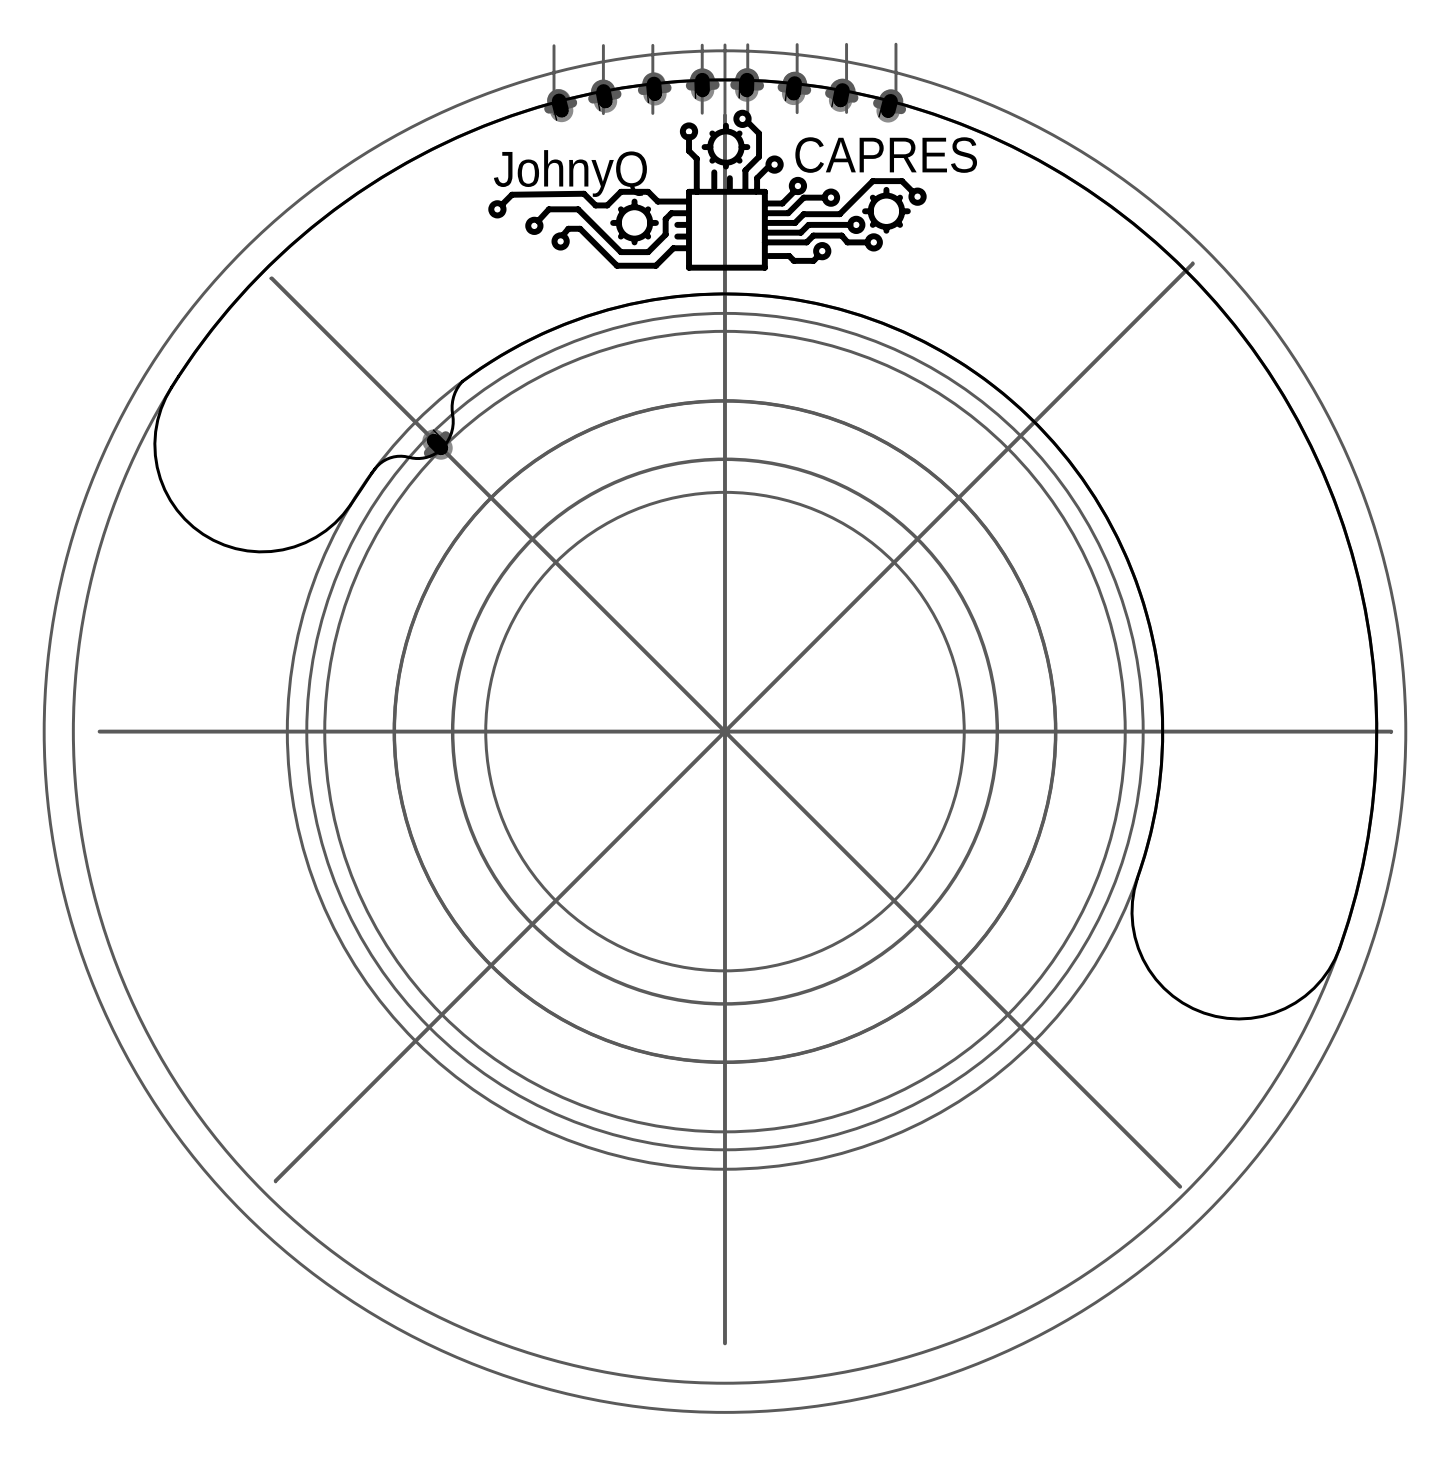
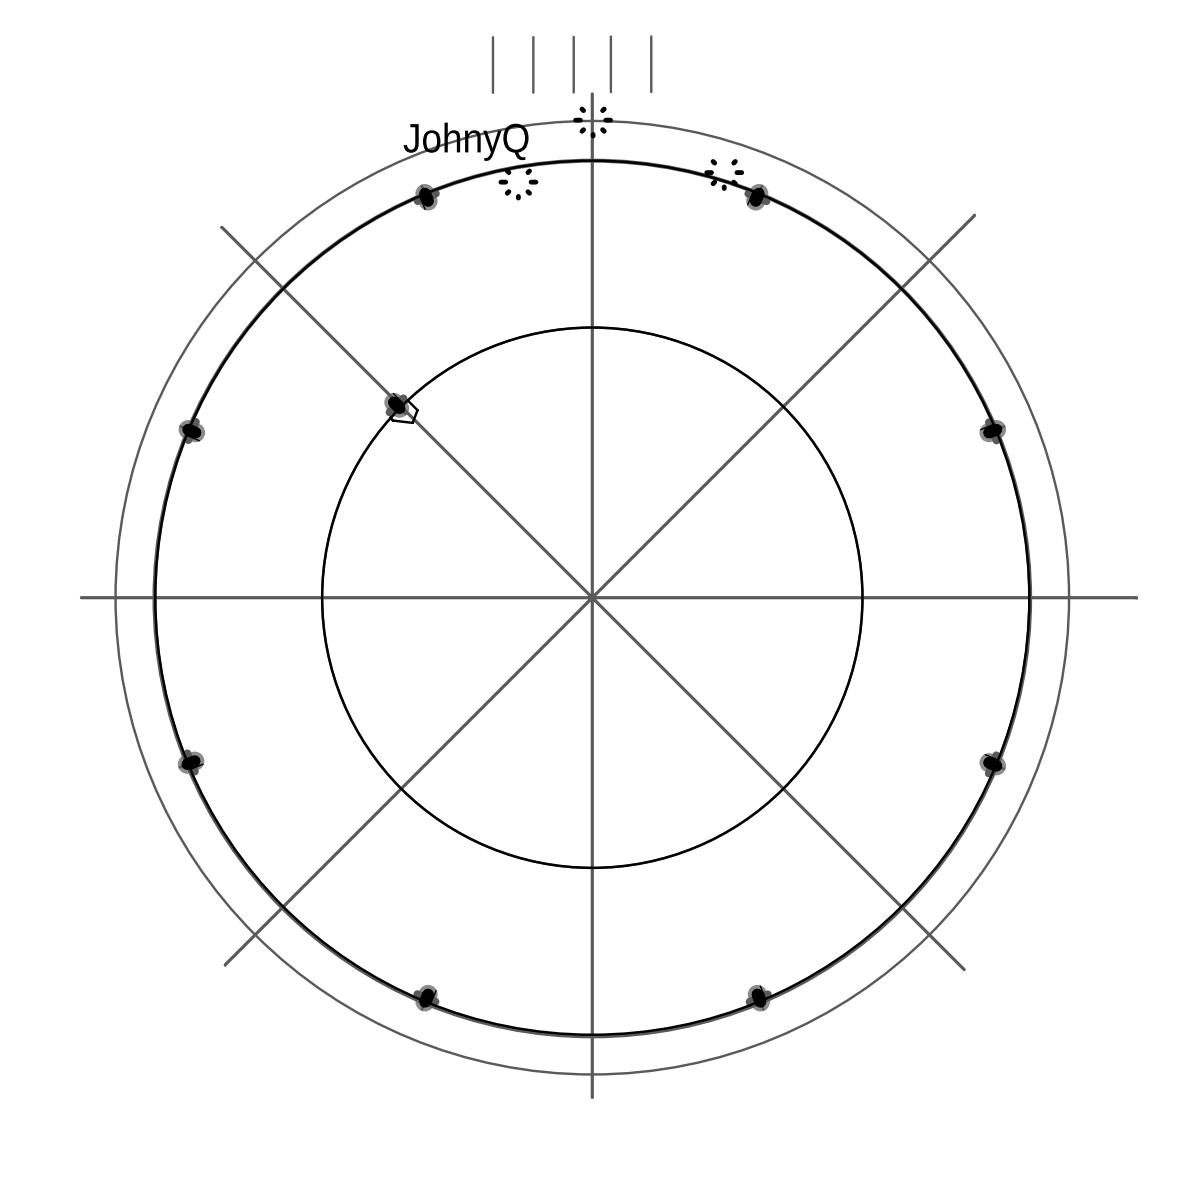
line: (724, 44) (724, 113) -> none
line: (846, 44) (846, 112) -> none
line: (895, 44) (895, 112) -> none
line: (554, 45) (554, 113) -> none
drawing: [42, 49, 1408, 1414] -> none
part: (702, 85) -> none
part: (747, 85) -> none
part: (654, 88) -> none
part: (794, 88) -> none
part: (841, 95) -> none
part: (604, 96) -> none
part: (560, 105) -> none
part: (889, 106) -> none
line: (748, 122) (759, 133) (759, 156) (745, 170) (745, 189) -> none
line: (725, 125) (725, 129) -> none
line: (689, 137) (689, 150) (696, 158) (696, 191) -> none
drawing: none -> [114, 119, 1071, 1076]
text: CAPRES (886, 155) -> none
line: (766, 168) (757, 178) (757, 189) -> none
line: (714, 172) (714, 187) -> none
line: (729, 178) (729, 187) -> none
line: (886, 189) (886, 193) -> none
line: (911, 190) (901, 181) (872, 181) (839, 214) (803, 214) (795, 222) (766, 222) -> none
line: (755, 191) (689, 191) (689, 267) (764, 267) (764, 191) (757, 191) -> none
line: (794, 191) (782, 203) (766, 203) -> none
round board edge: none -> [154, 159, 1031, 1036]
line: (823, 197) (803, 197) (788, 213) (766, 213) -> none
line: (634, 201) (634, 205) -> none
line: (687, 201) (657, 201) (648, 191) (620, 191) (607, 205) (595, 205) (583, 193) (511, 194) (502, 204) -> none
line: (687, 213) (671, 213) (665, 219) (665, 234) (648, 252) (620, 252) (578, 209) (548, 209) (538, 221) -> none
line: (677, 224) (687, 224) -> none
line: (850, 224) (808, 224) (800, 232) (766, 232) -> none
line: (563, 234) (568, 228) (580, 228) (617, 265) (655, 265) (673, 248) (687, 248) -> none
line: (677, 236) (687, 236) -> none
part: none -> (426, 197)
part: none -> (757, 197)
line: (764, 242) (806, 242) (813, 235) (841, 235) (847, 242) (866, 242) -> none
line: (768, 256) (789, 256) (794, 260) (813, 260) (818, 256) -> none
board edge: (178, 376) (161, 408) (155, 431) (157, 467) (164, 489) (184, 519) (213, 540) (247, 550) (271, 551) (305, 542) (325, 530) (343, 514) (371, 472) (383, 461) (397, 456) (423, 458) (439, 450) (447, 441) (451, 432) (452, 401) (457, 388) (462, 381) (521, 344) (585, 316) (630, 304) (676, 296) (723, 293) (769, 296) (815, 303) (860, 315) (925, 342) (965, 365) (1002, 393) (1053, 441) (1082, 478) (1107, 517) (1136, 581) (1154, 648) (1162, 718) (1161, 764) (1155, 810) (1132, 901) (1134, 937) (1148, 969) (1163, 988) (1182, 1002) (1215, 1016) (1239, 1018) (1274, 1013) (1295, 1002) (1314, 988) (1334, 959) (1356, 893) (1368, 837) (1374, 780) (1376, 723) (1373, 665) (1365, 609) (1352, 553) (1333, 498) (1311, 446) (1283, 395) (1234, 325) (1197, 282) (1155, 242) (1110, 206) (1063, 174) (1013, 146) (960, 123) (906, 105) (850, 91) (793, 83) (736, 79) (679, 81) (622, 87) (565, 99) (510, 115) (457, 137) (381, 177) (334, 209) (290, 246) (249, 286) (211, 329) (178, 376) -> none
round board edge: none -> [320, 326, 864, 870]
part position: (437, 444) -> (396, 405)
board edge: none -> (407, 400) (417, 410) (412, 422) (392, 420) (390, 417)
part: none -> (191, 430)
part: none -> (992, 431)
part: none -> (191, 762)
part: none -> (992, 764)
part: none -> (426, 998)
part: none -> (758, 998)

